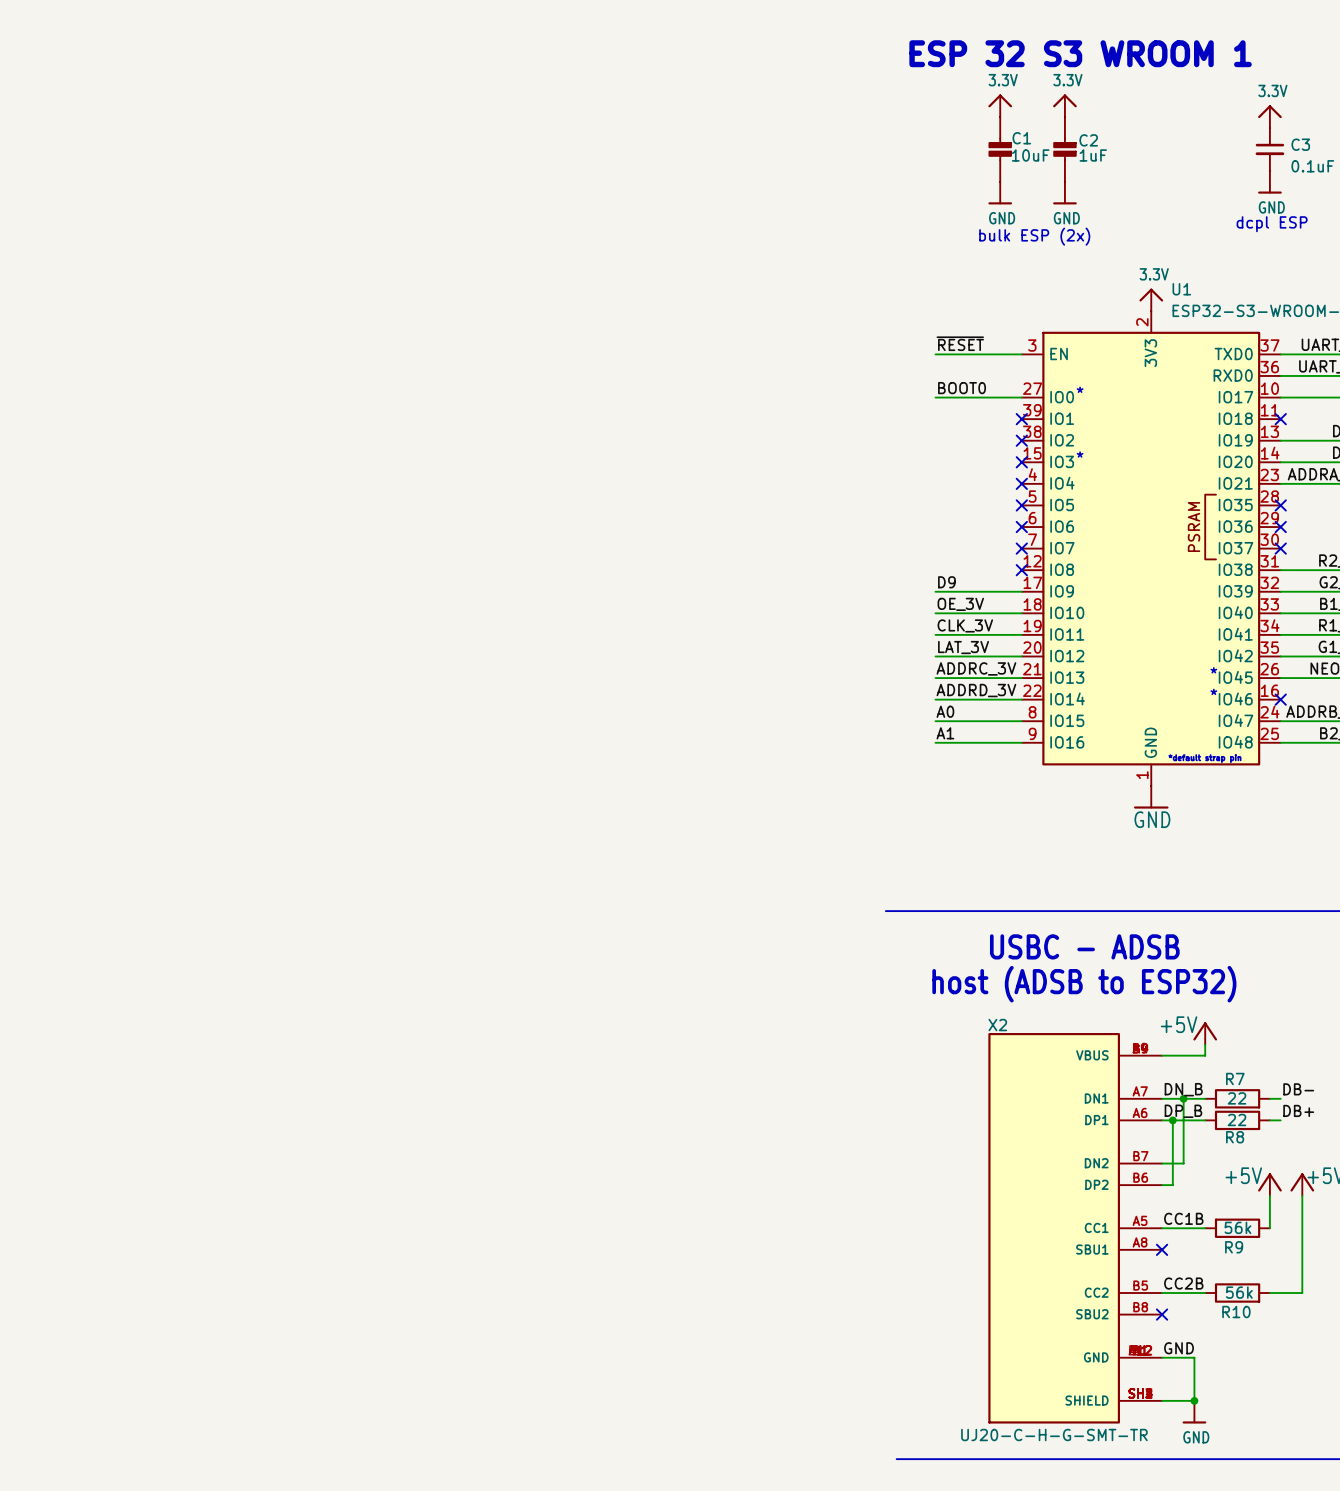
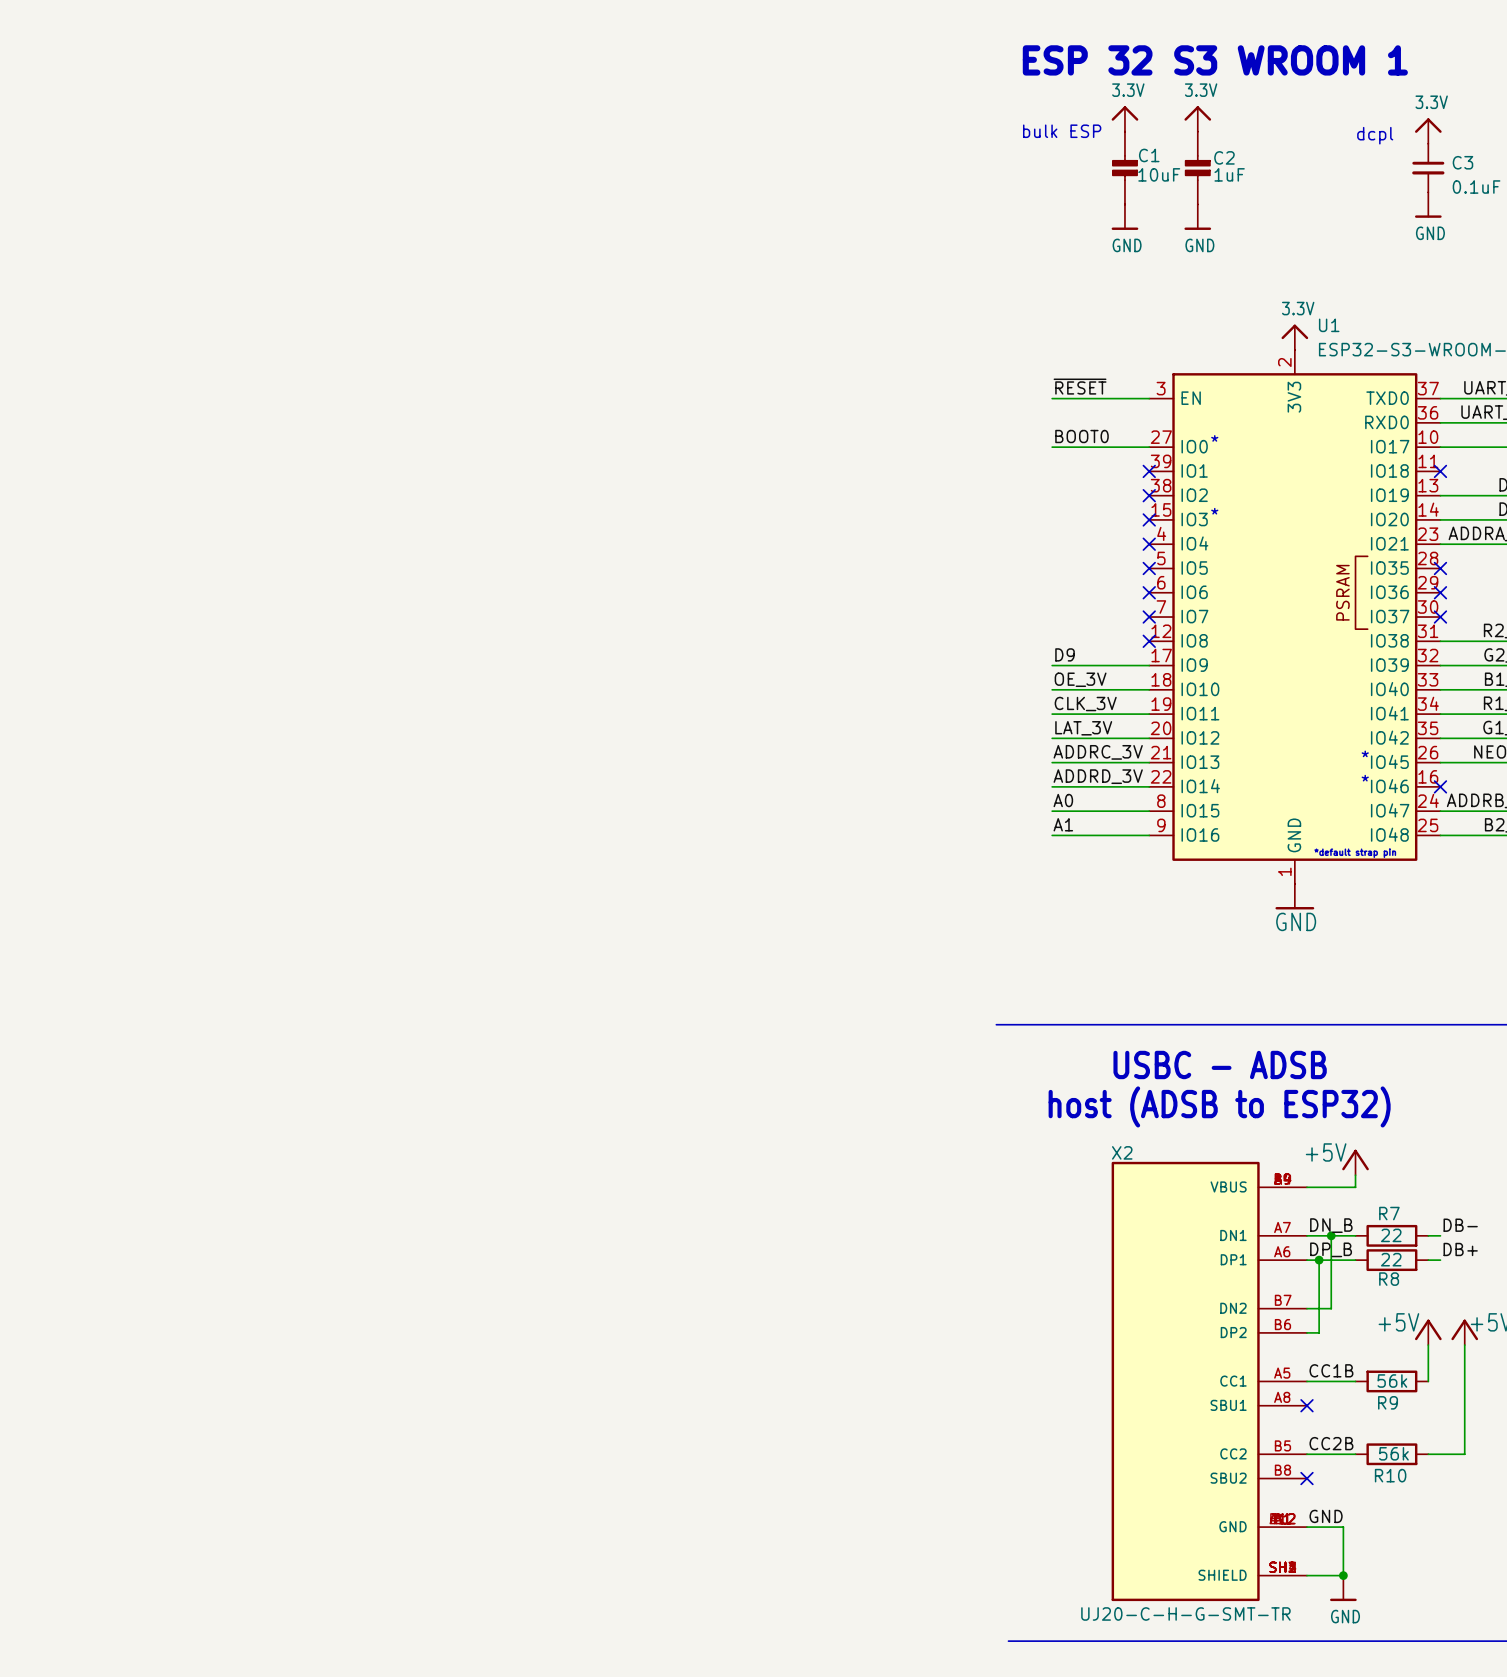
text: none -> bulk ESP (1062, 131)
text: none -> dcpl (1375, 135)
text: dcpl ESP (1272, 224) -> none
text: bulk ESP (2x) (1034, 236) -> none

